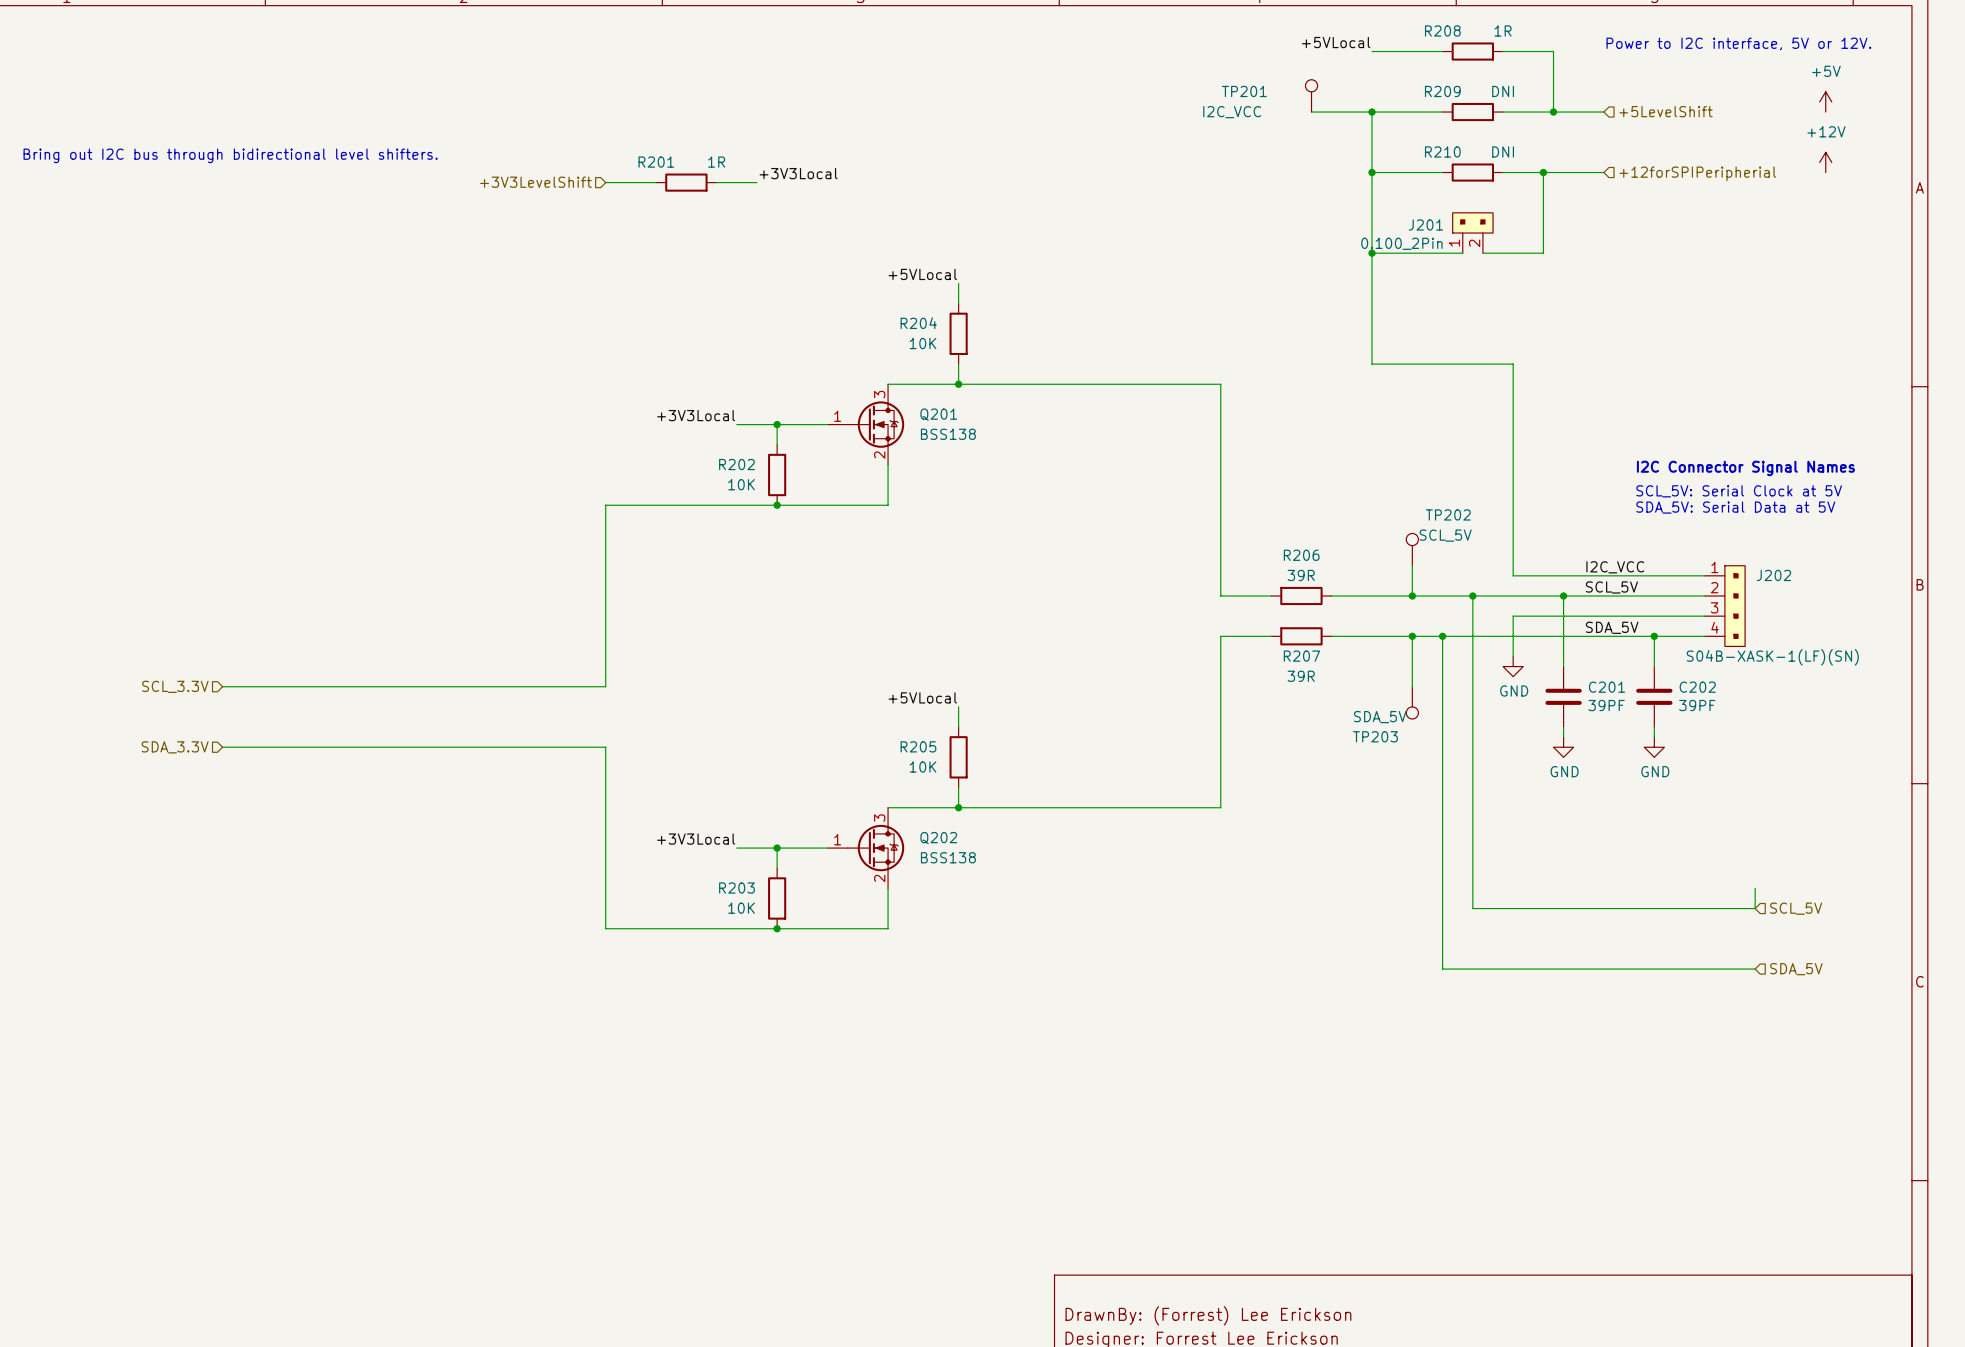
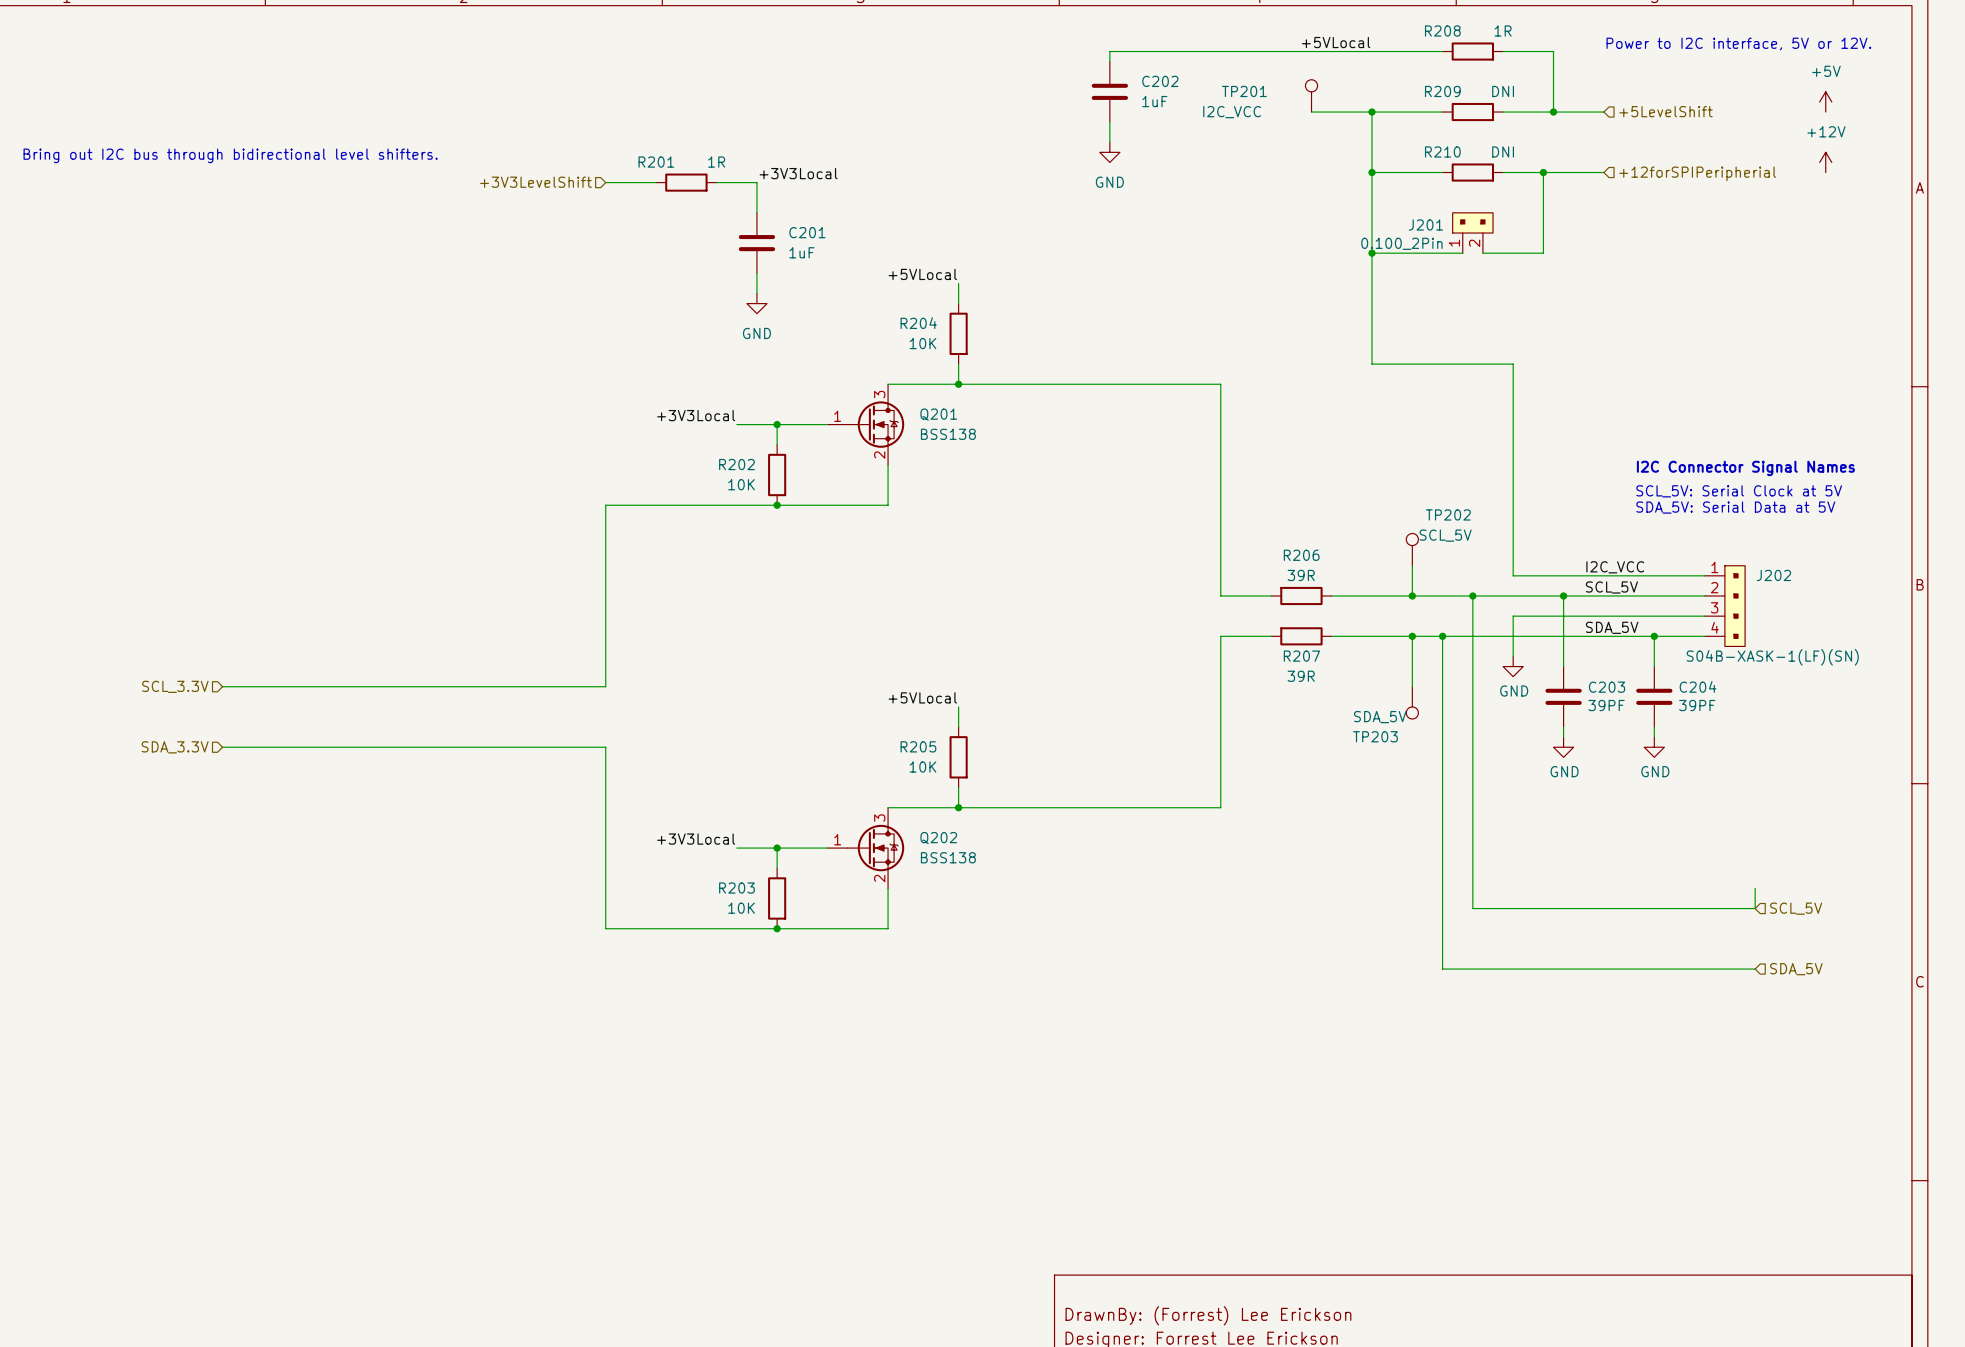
wire: none -> (1372, 51) (1109, 51) (1109, 61)
C202: none -> 1uF (1109, 91)
wire: none -> (1109, 122) (1109, 142)
power symbol: none -> GND (1109, 152)
wire: none -> (756, 182) (756, 212)
C201: none -> 1uF (756, 243)
wire: none -> (756, 273) (756, 293)
power symbol: none -> GND (756, 303)
C201 name: C201 (1607, 687) -> C203 (1607, 687)
C202 name: C202 (1697, 687) -> C204 (1698, 686)

